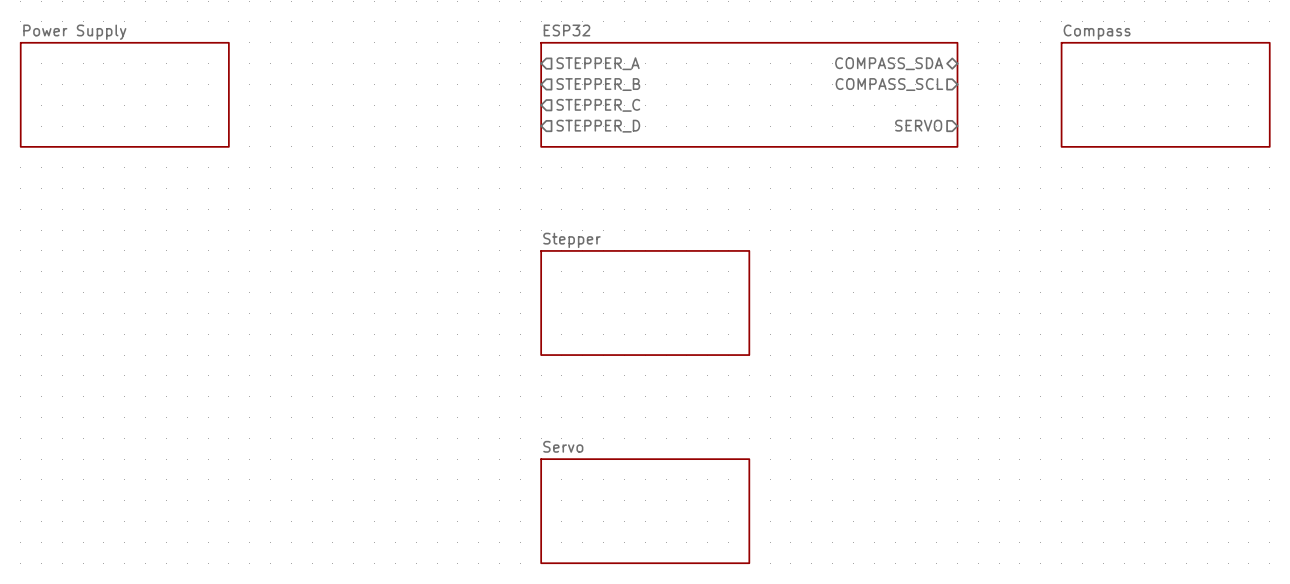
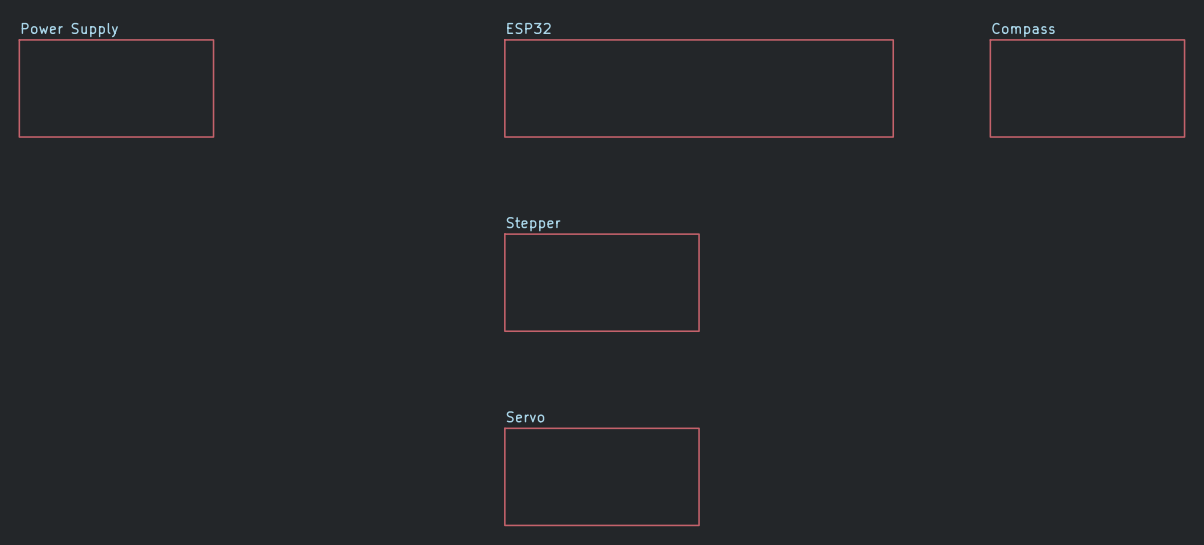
sheet pin: STEPPER_A (598, 63) -> none
sheet pin: COMPASS_SDA (889, 63) -> none
sheet pin: STEPPER_B (598, 84) -> none
sheet pin: COMPASS_SCL (889, 84) -> none
sheet pin: STEPPER_C (598, 105) -> none
sheet pin: SERVO (918, 125) -> none
sheet pin: STEPPER_D (598, 126) -> none

